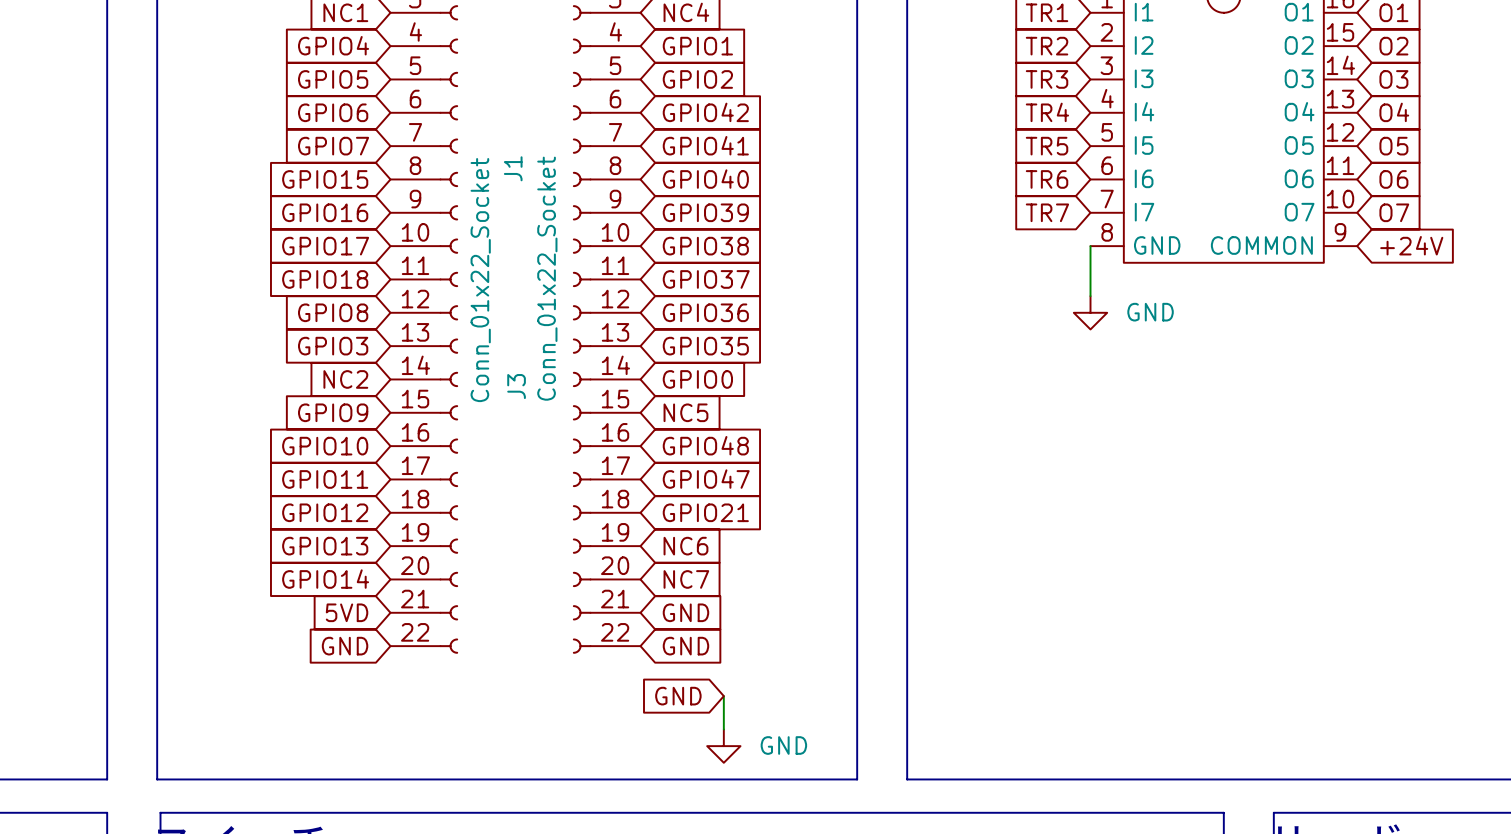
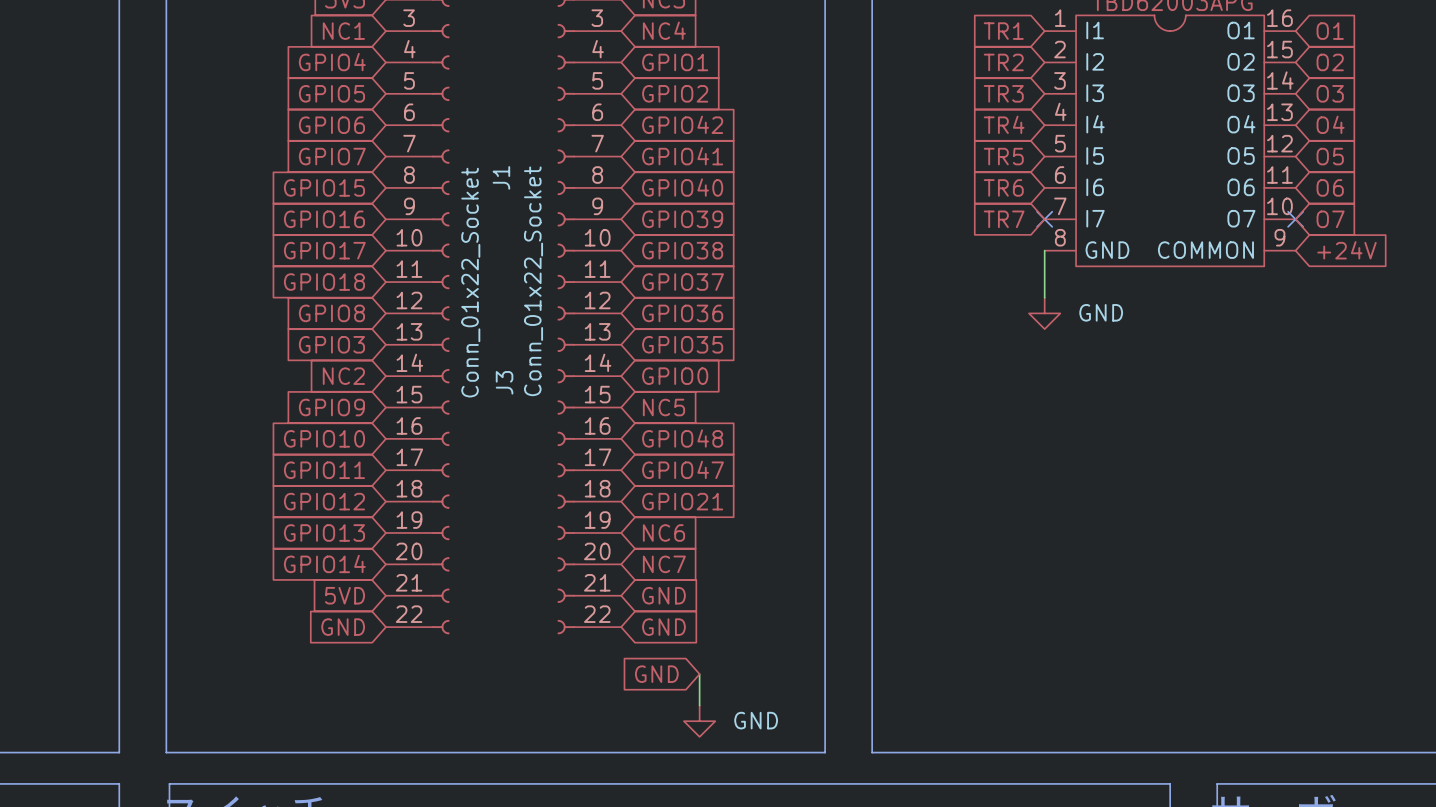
no-connect mark: none -> (1044, 219)
no-connect mark: none -> (1295, 219)

